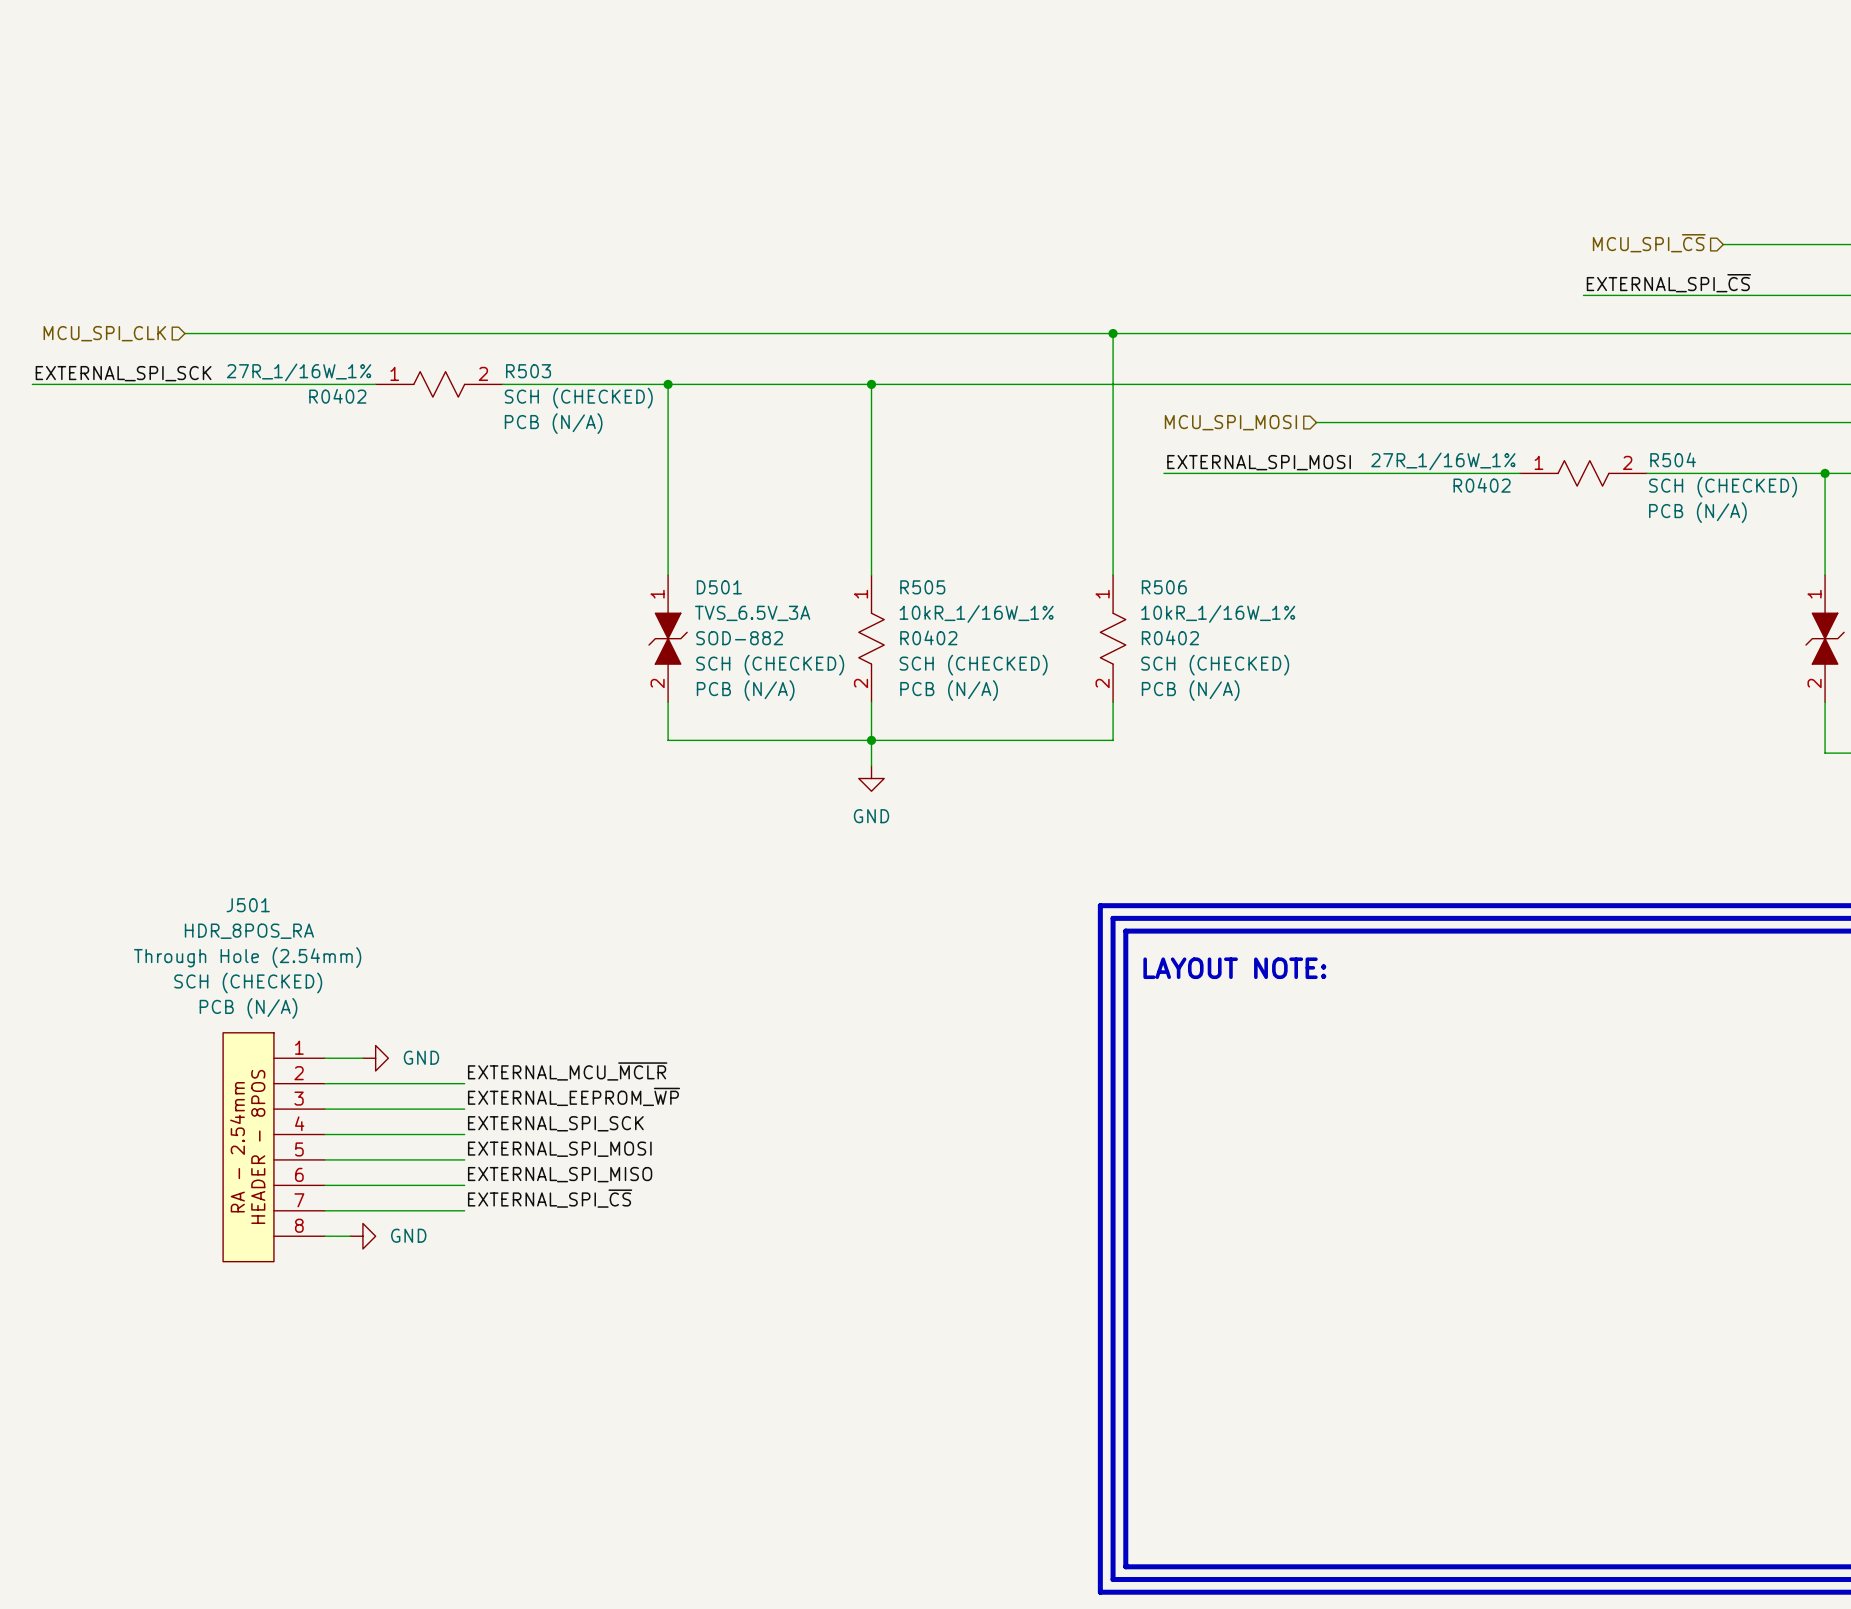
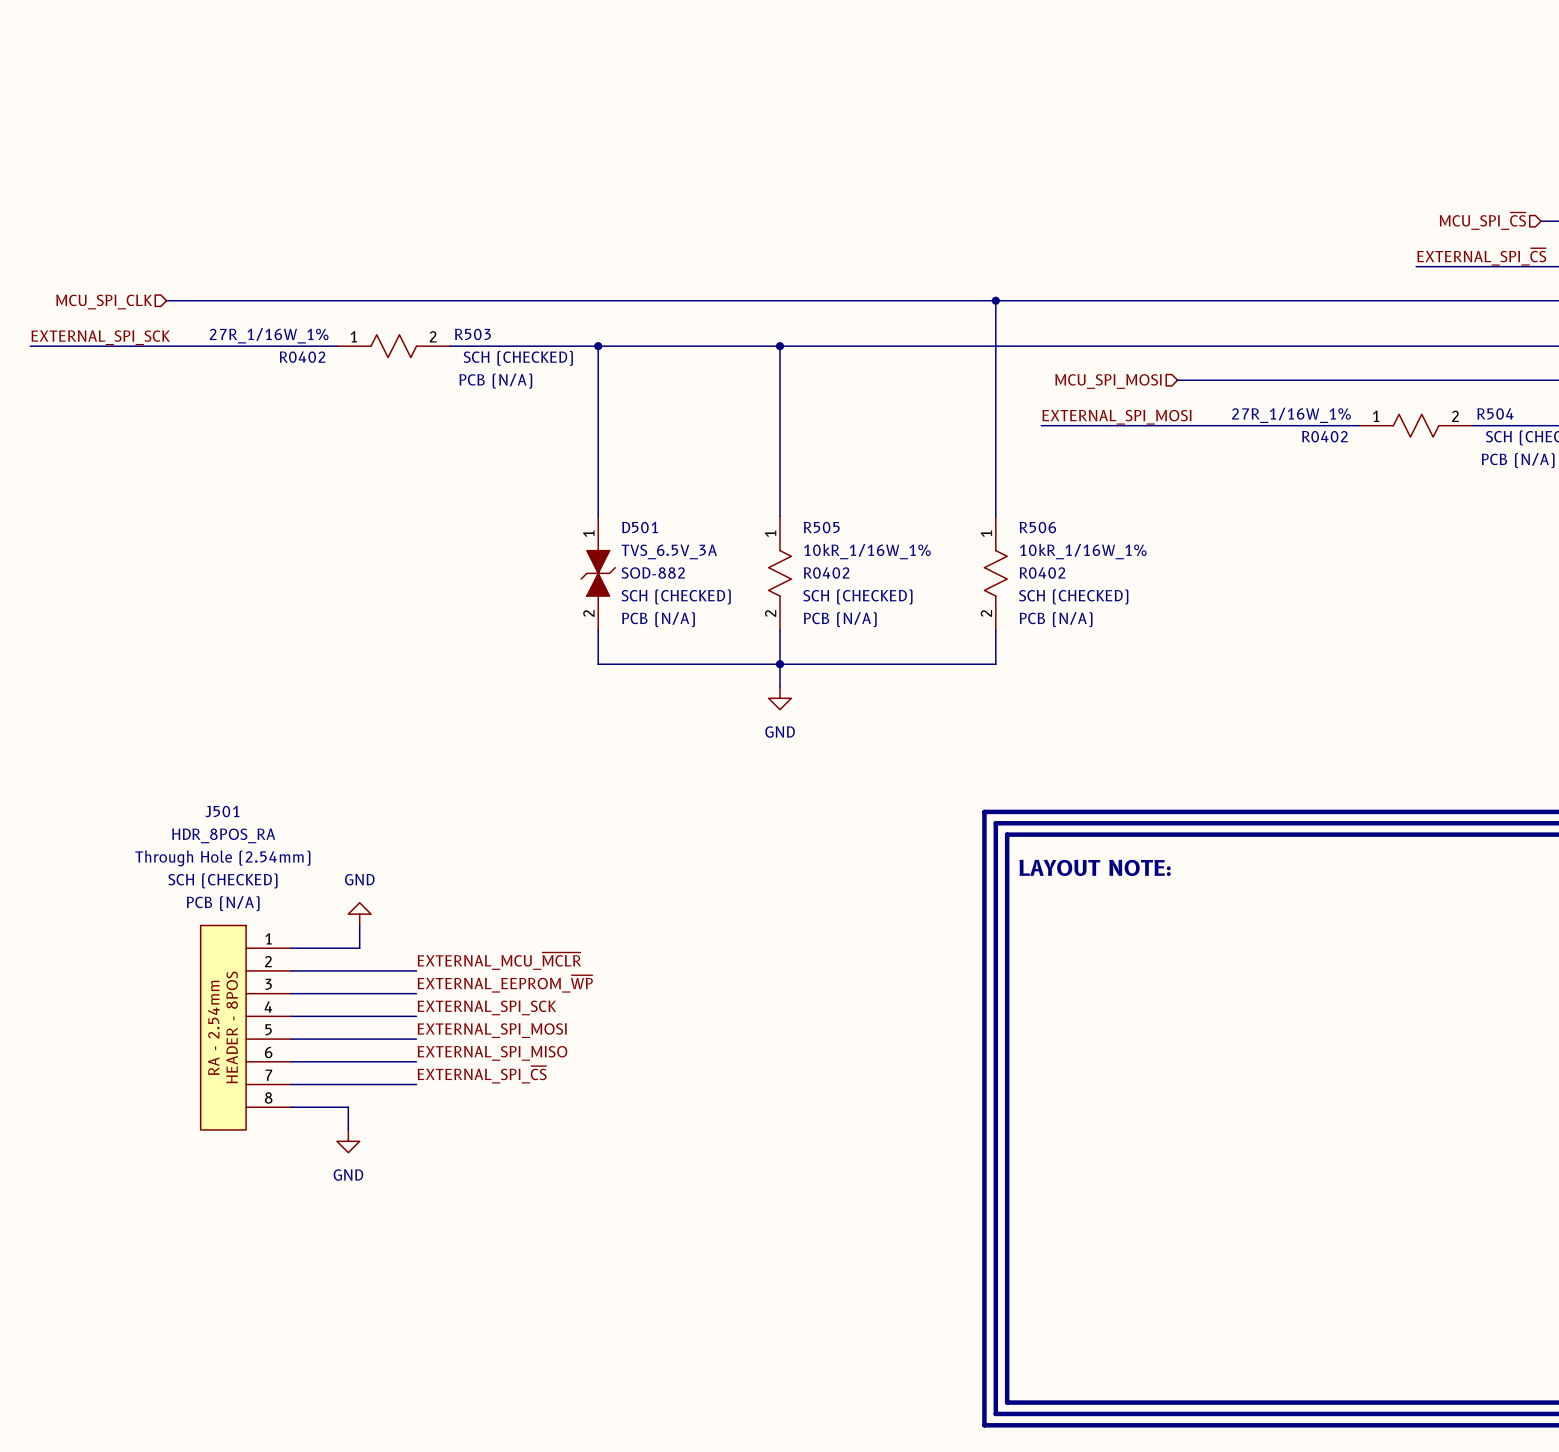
wire: none -> (359, 925) (359, 948) (325, 948)
power symbol rotation: 0° (375, 1058) -> 90° counterclockwise (359, 914)
power symbol position: GND (375, 1058) -> GND (359, 914)
wire: none -> (314, 1107) (348, 1107) (348, 1129)
power symbol rotation: 0° (362, 1236) -> 90° clockwise (348, 1141)
power symbol position: GND (362, 1236) -> GND (348, 1141)

